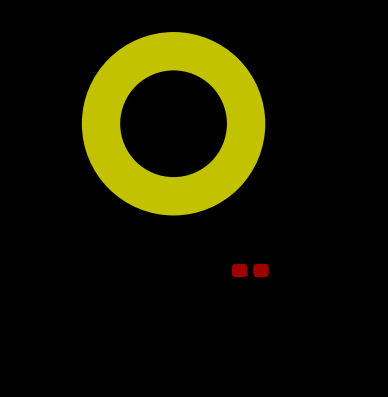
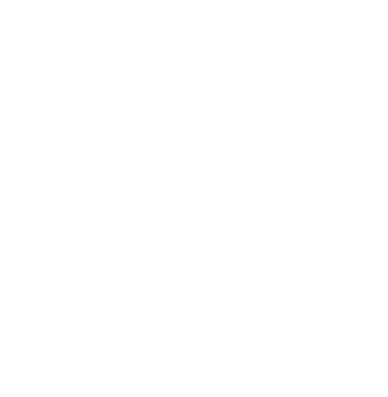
part: (173, 123) -> none
part: (250, 270) -> none

